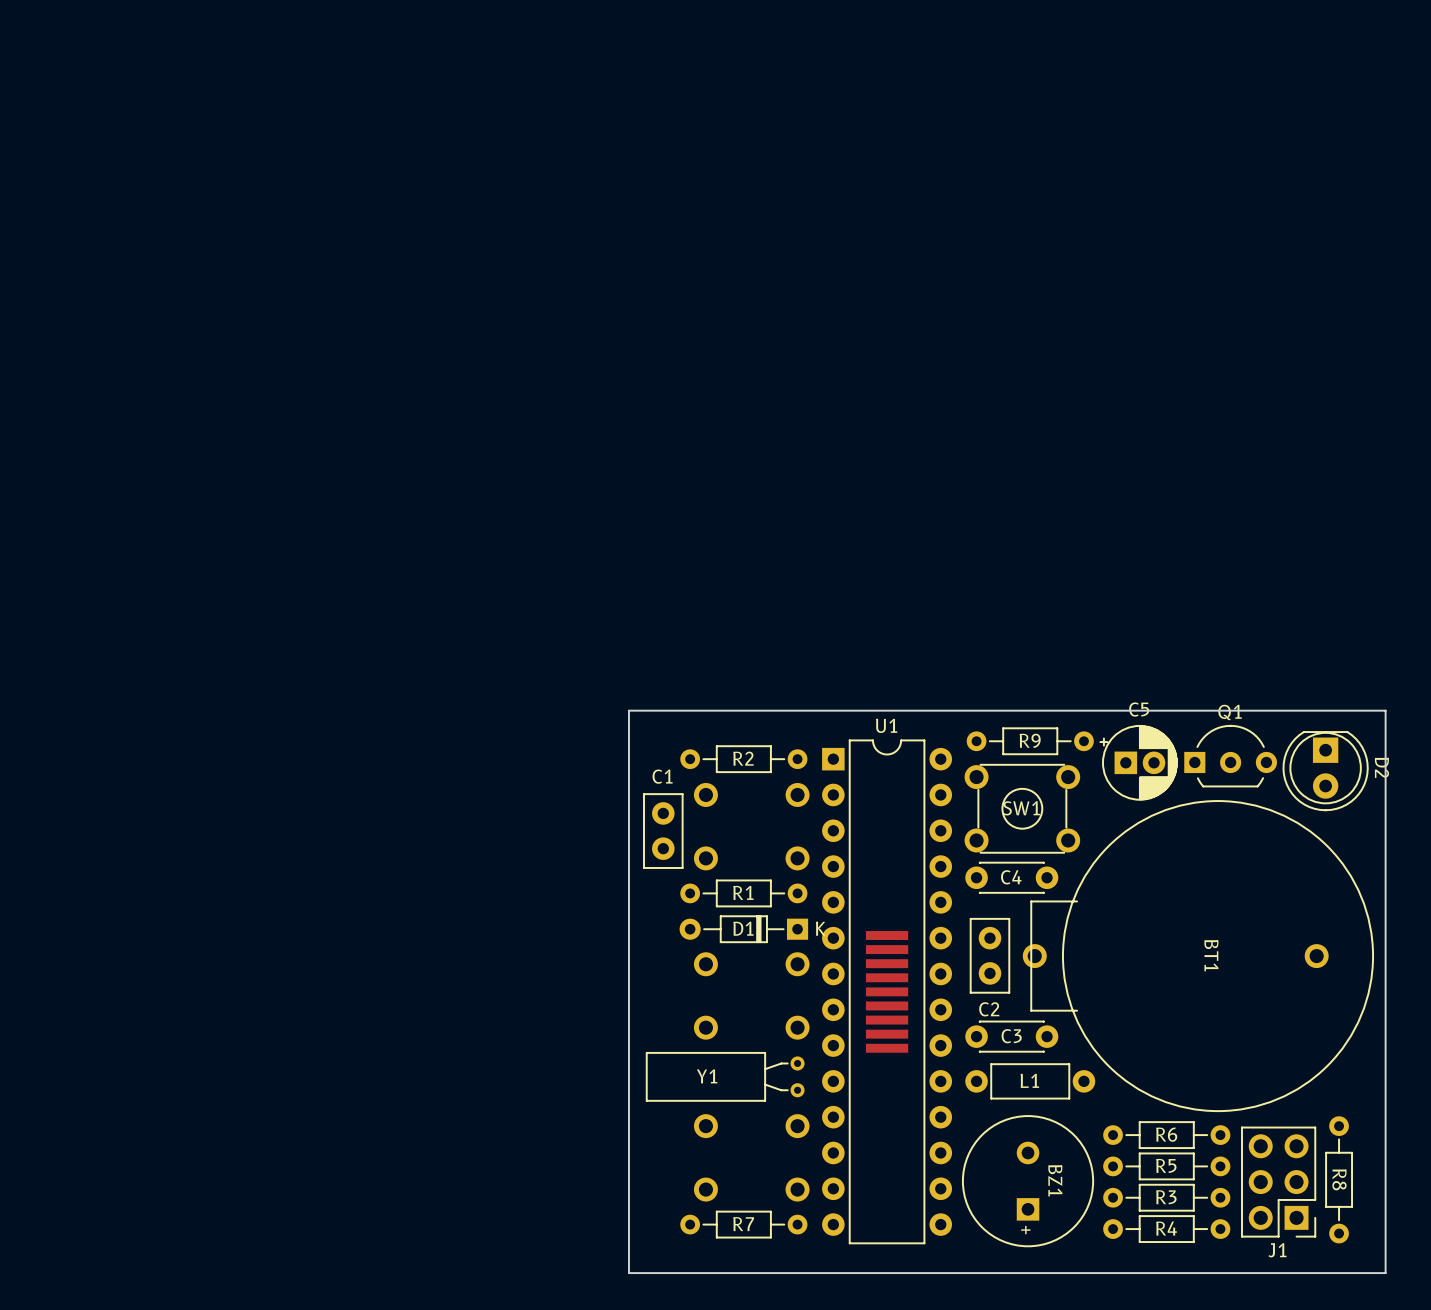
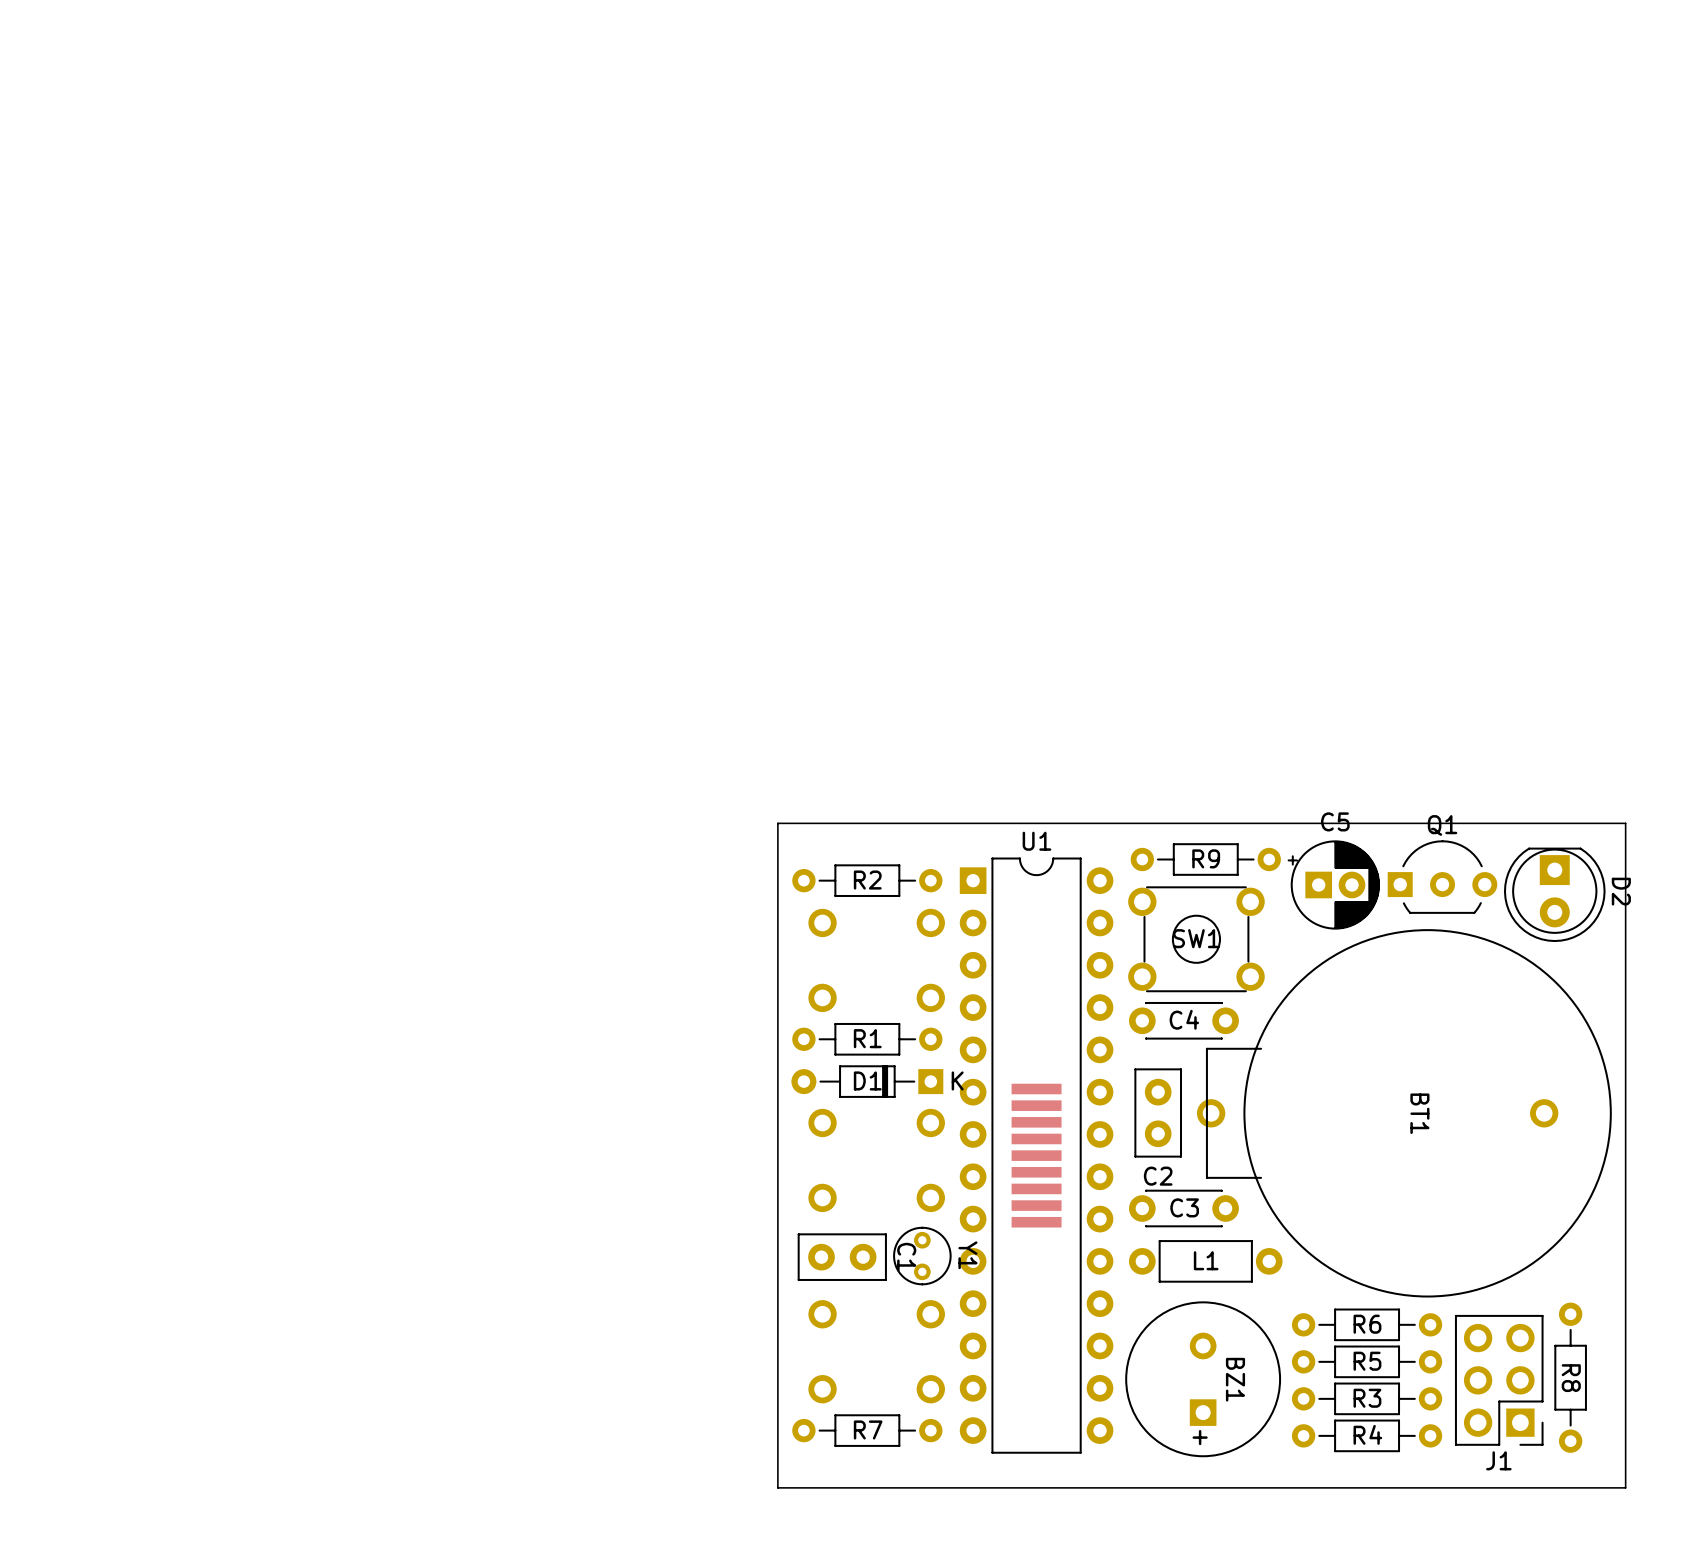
board edge: (668, 710) (628, 710) (628, 1273) (668, 1273) -> (777, 823) (777, 1487)
C1 rotation: 0° (663, 831) -> 90° clockwise (842, 1257)
C1 position: (663, 831) -> (842, 1257)
Y1 footprint: [645, 1052, 805, 1102] -> [893, 1226, 952, 1286]
Y1 name position: Y1 (707, 1076) -> Y1 (967, 1255)

